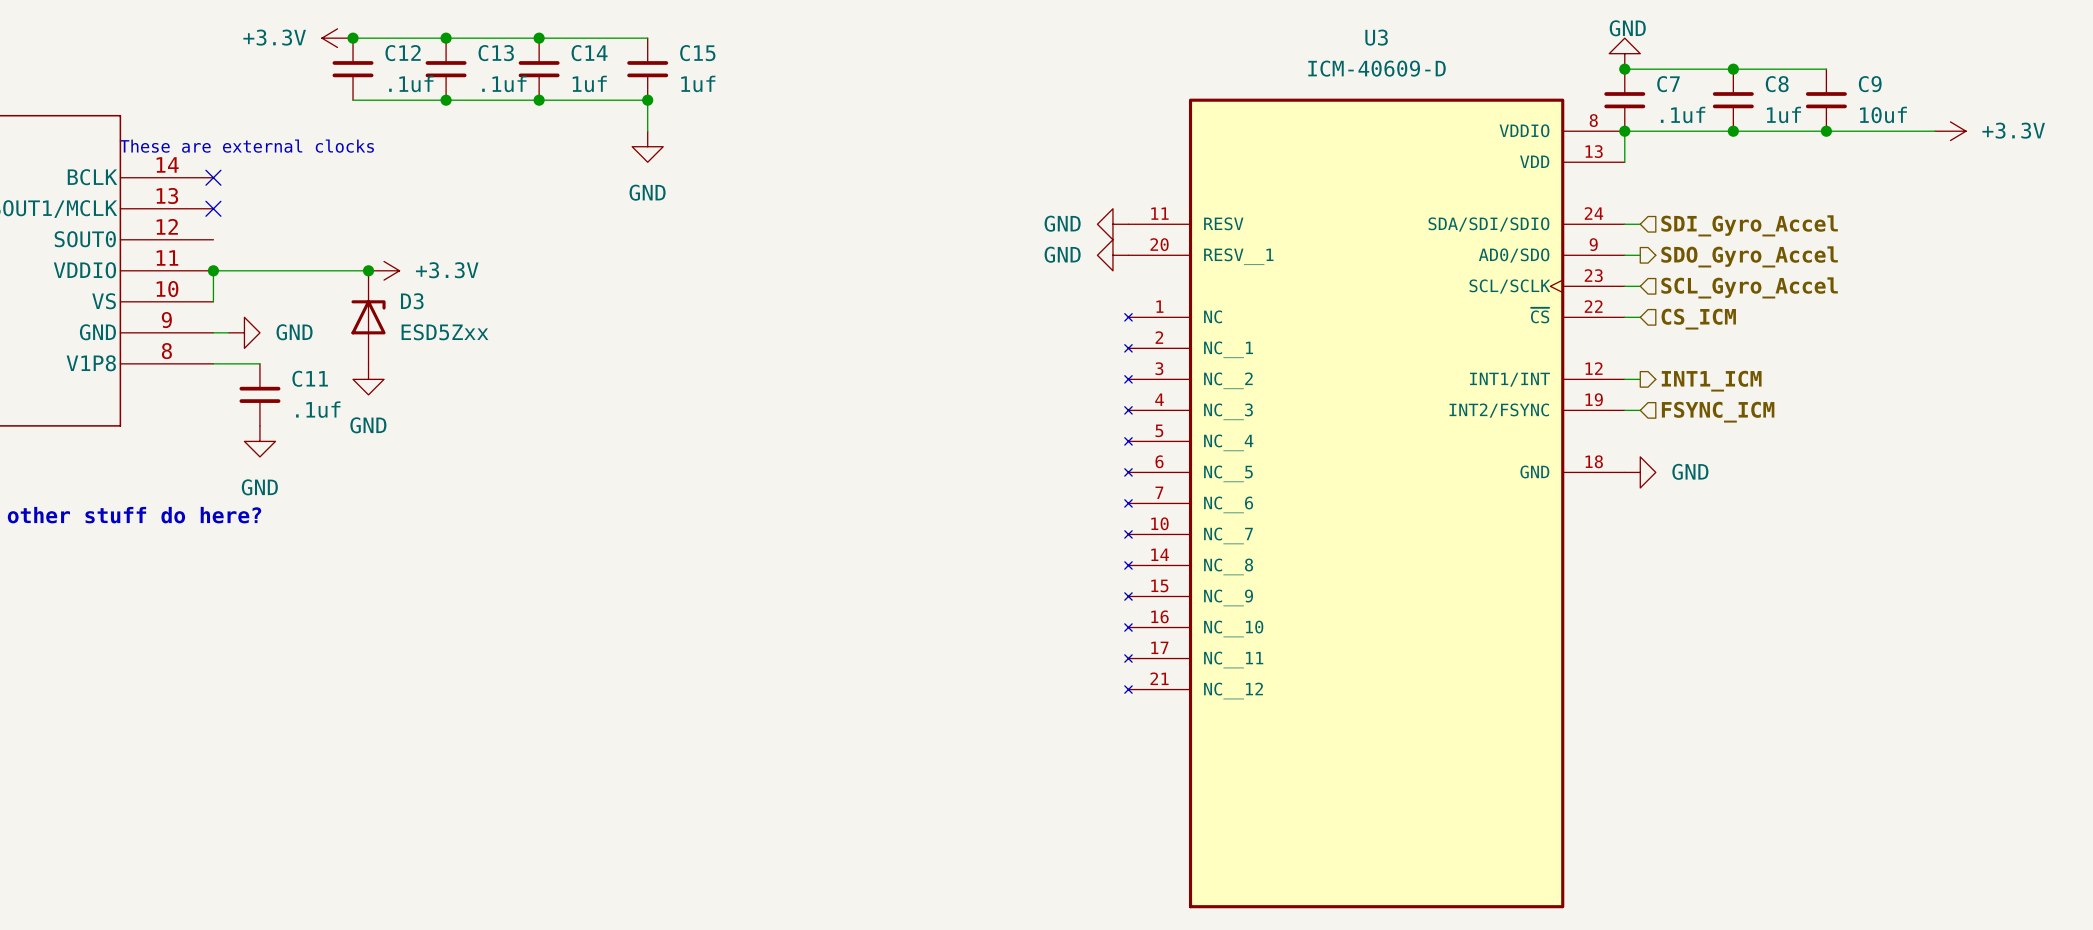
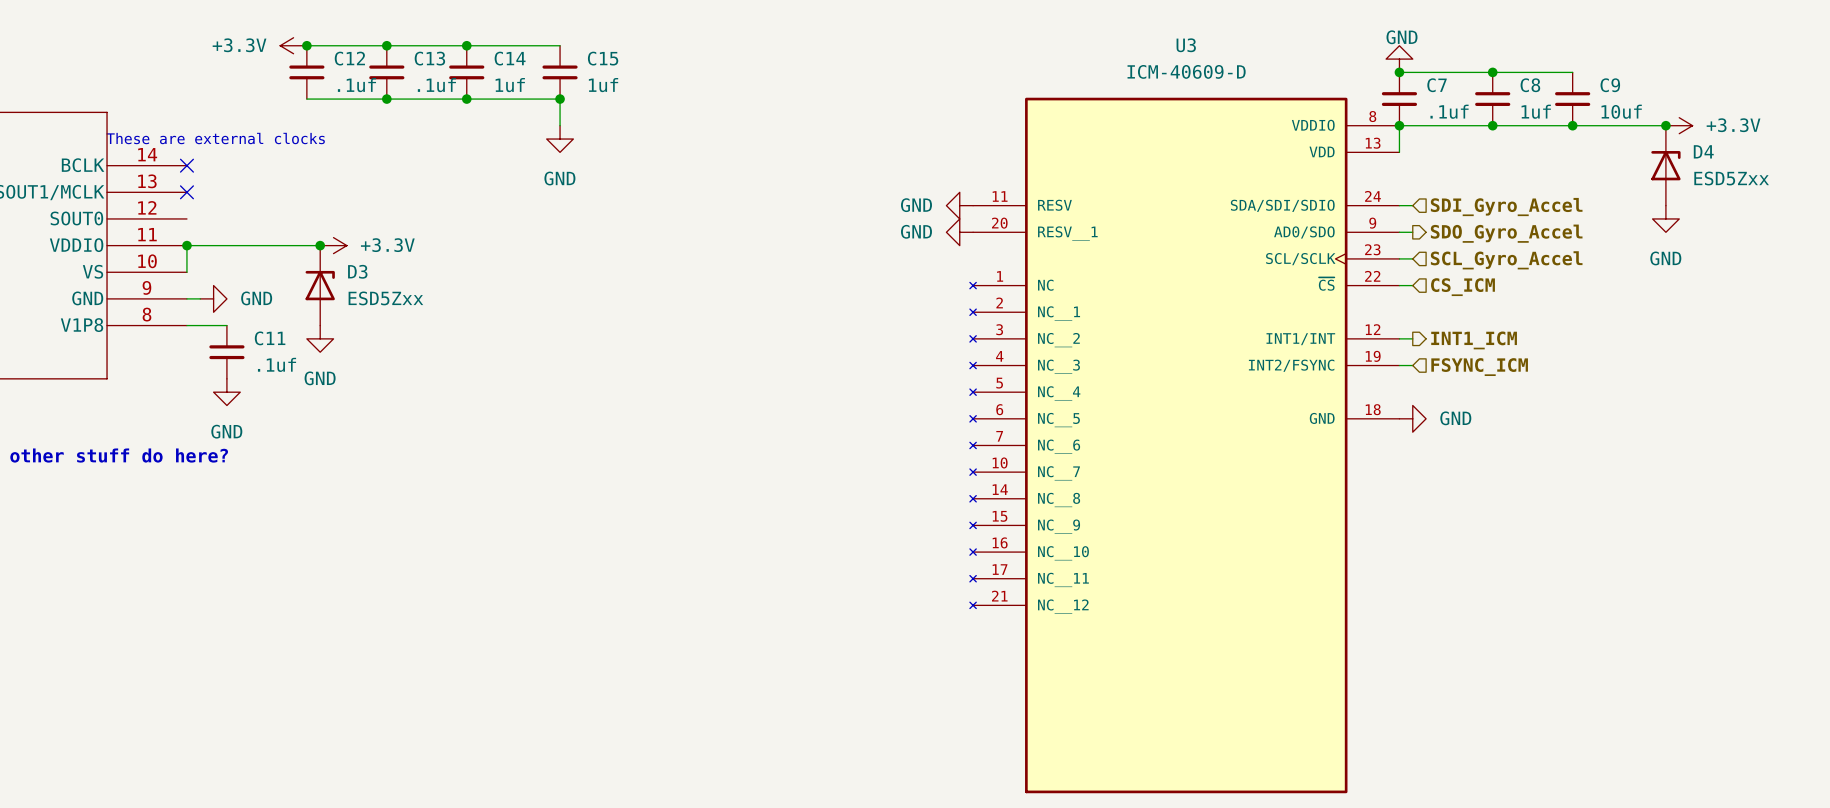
junction: none -> (1665, 125)
D4: none -> ESD5Zxx (1665, 165)
power symbol: none -> GND (1665, 218)

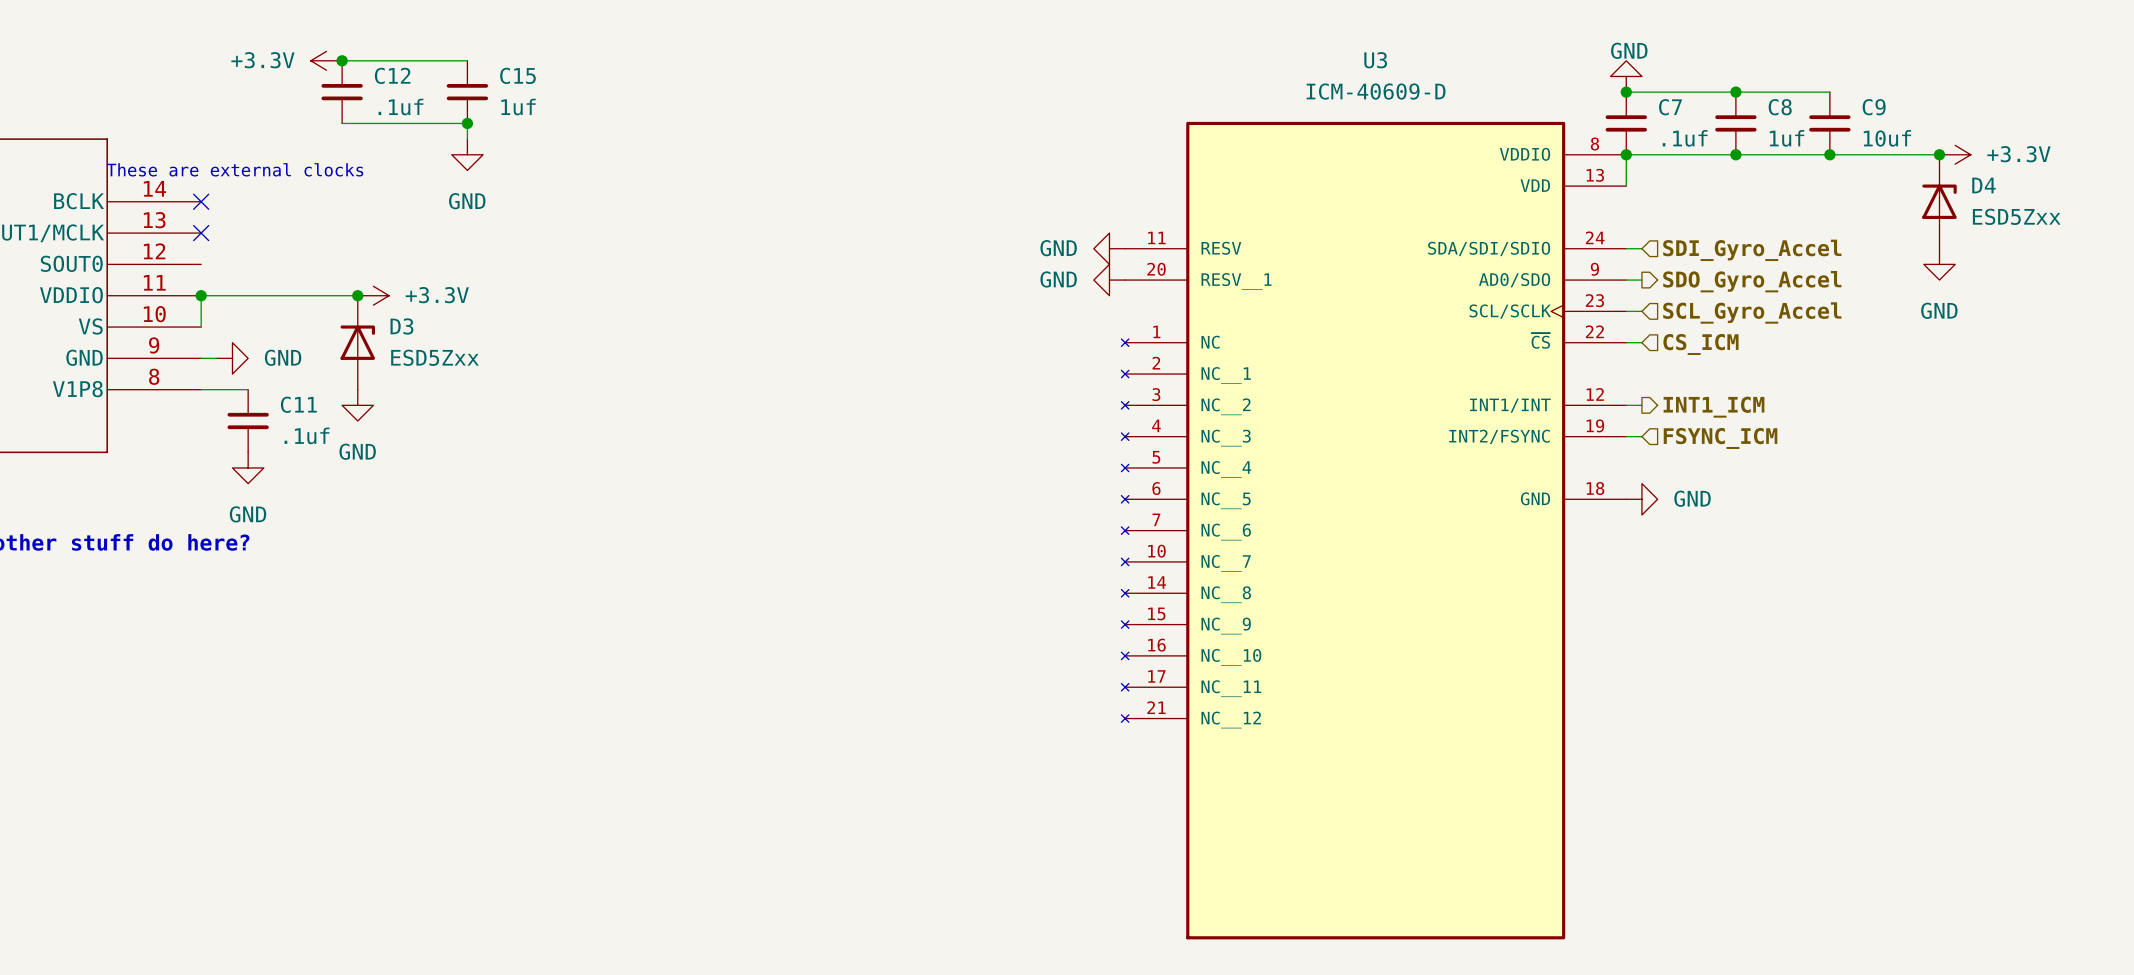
junction: (386, 45) -> none
wire: (413, 45) (560, 45) -> none
junction: (466, 45) -> none
C13: .1uf (386, 72) -> none
C14: 1uf (466, 72) -> none
C15 position: (560, 72) -> (467, 92)
junction: (386, 99) -> none
wire: (413, 99) (560, 99) (560, 125) -> (467, 123) (467, 139)
junction: none -> (467, 123)
junction: (466, 99) -> none
junction: (560, 99) -> none
power symbol position: GND (560, 139) -> GND (467, 154)

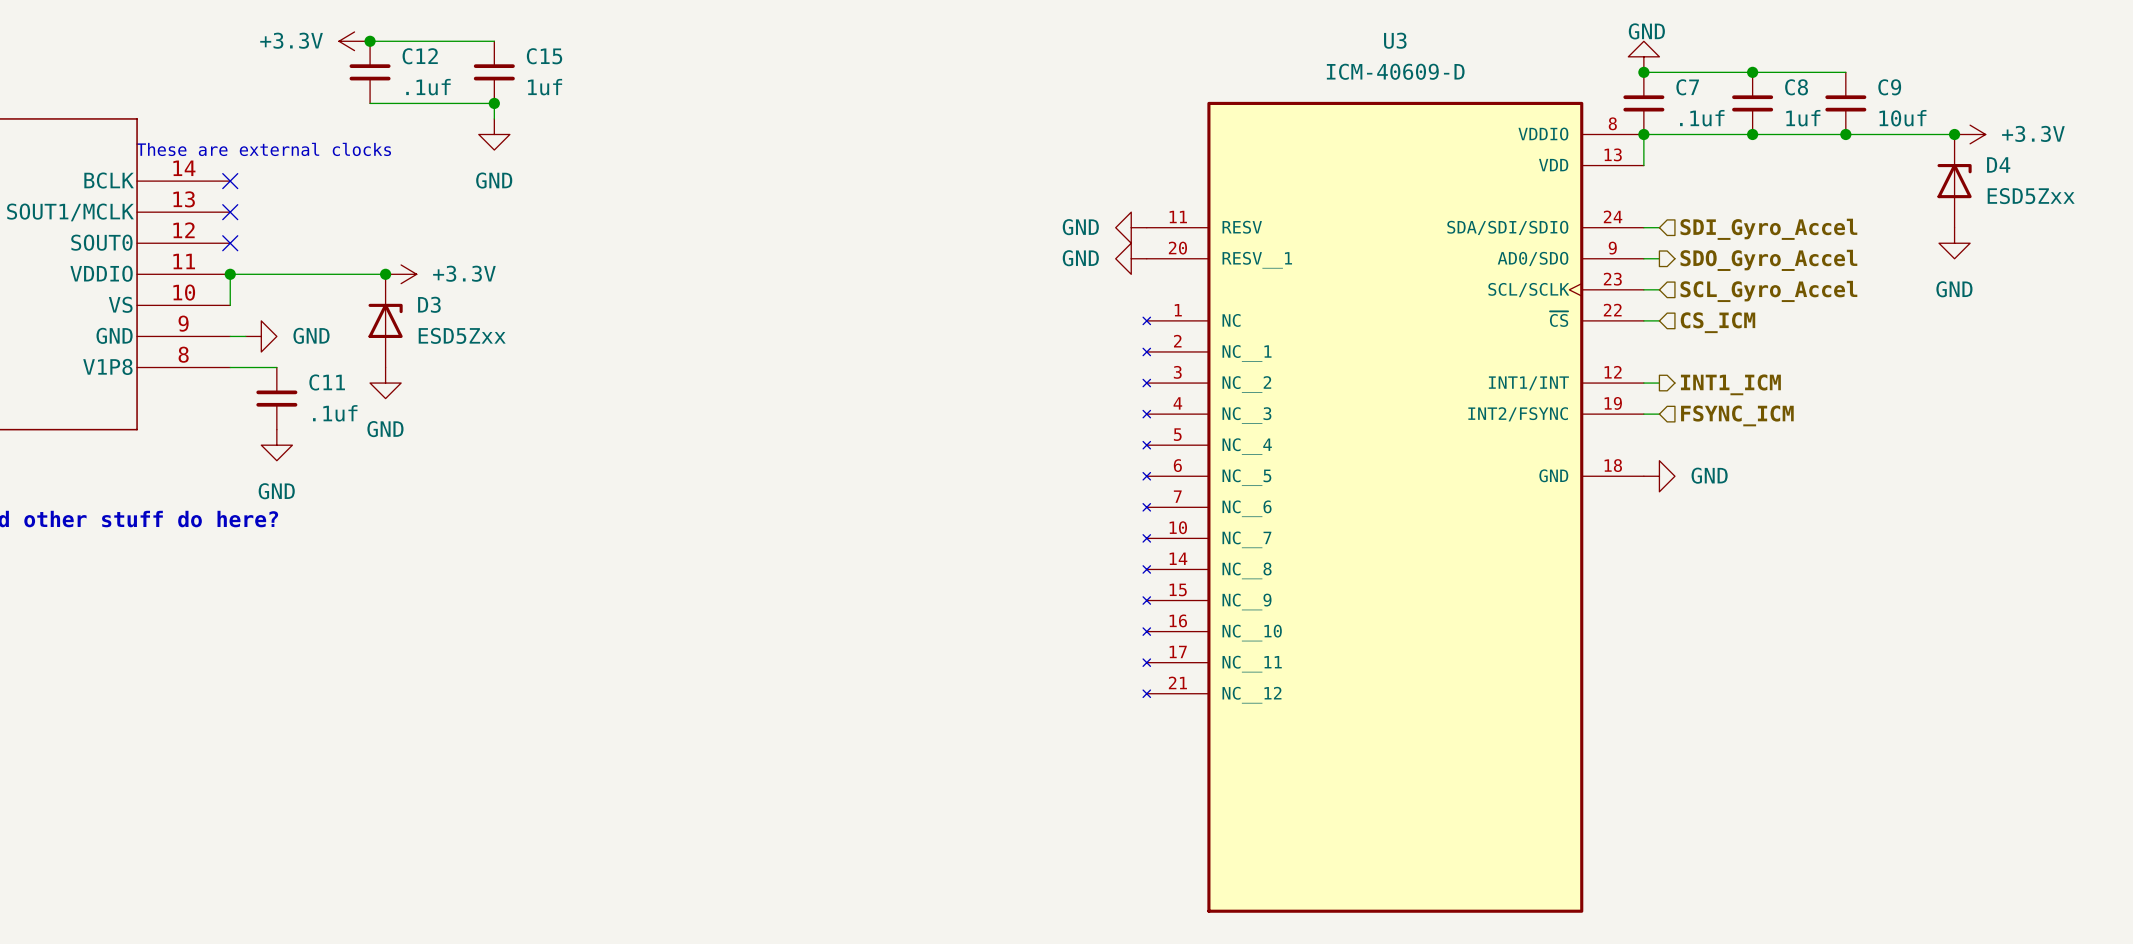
no-connect mark: none -> (230, 243)

